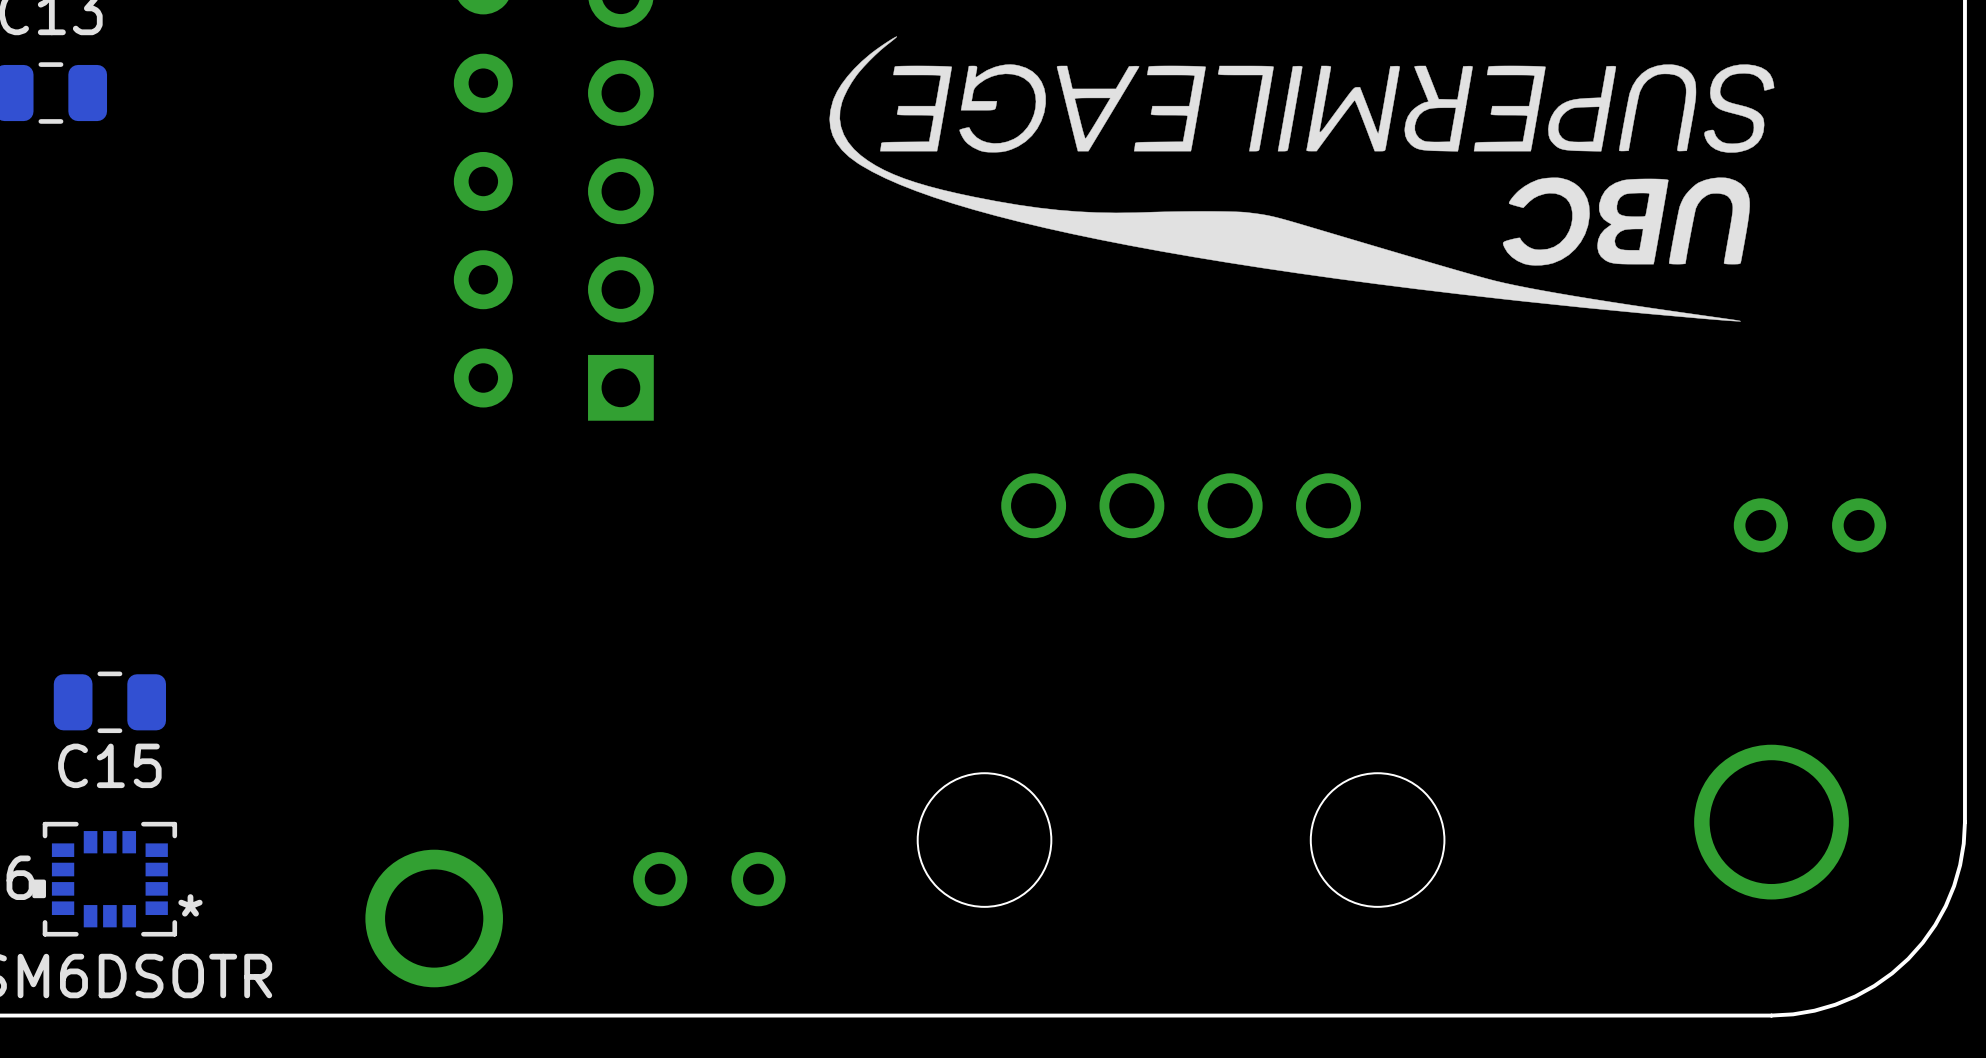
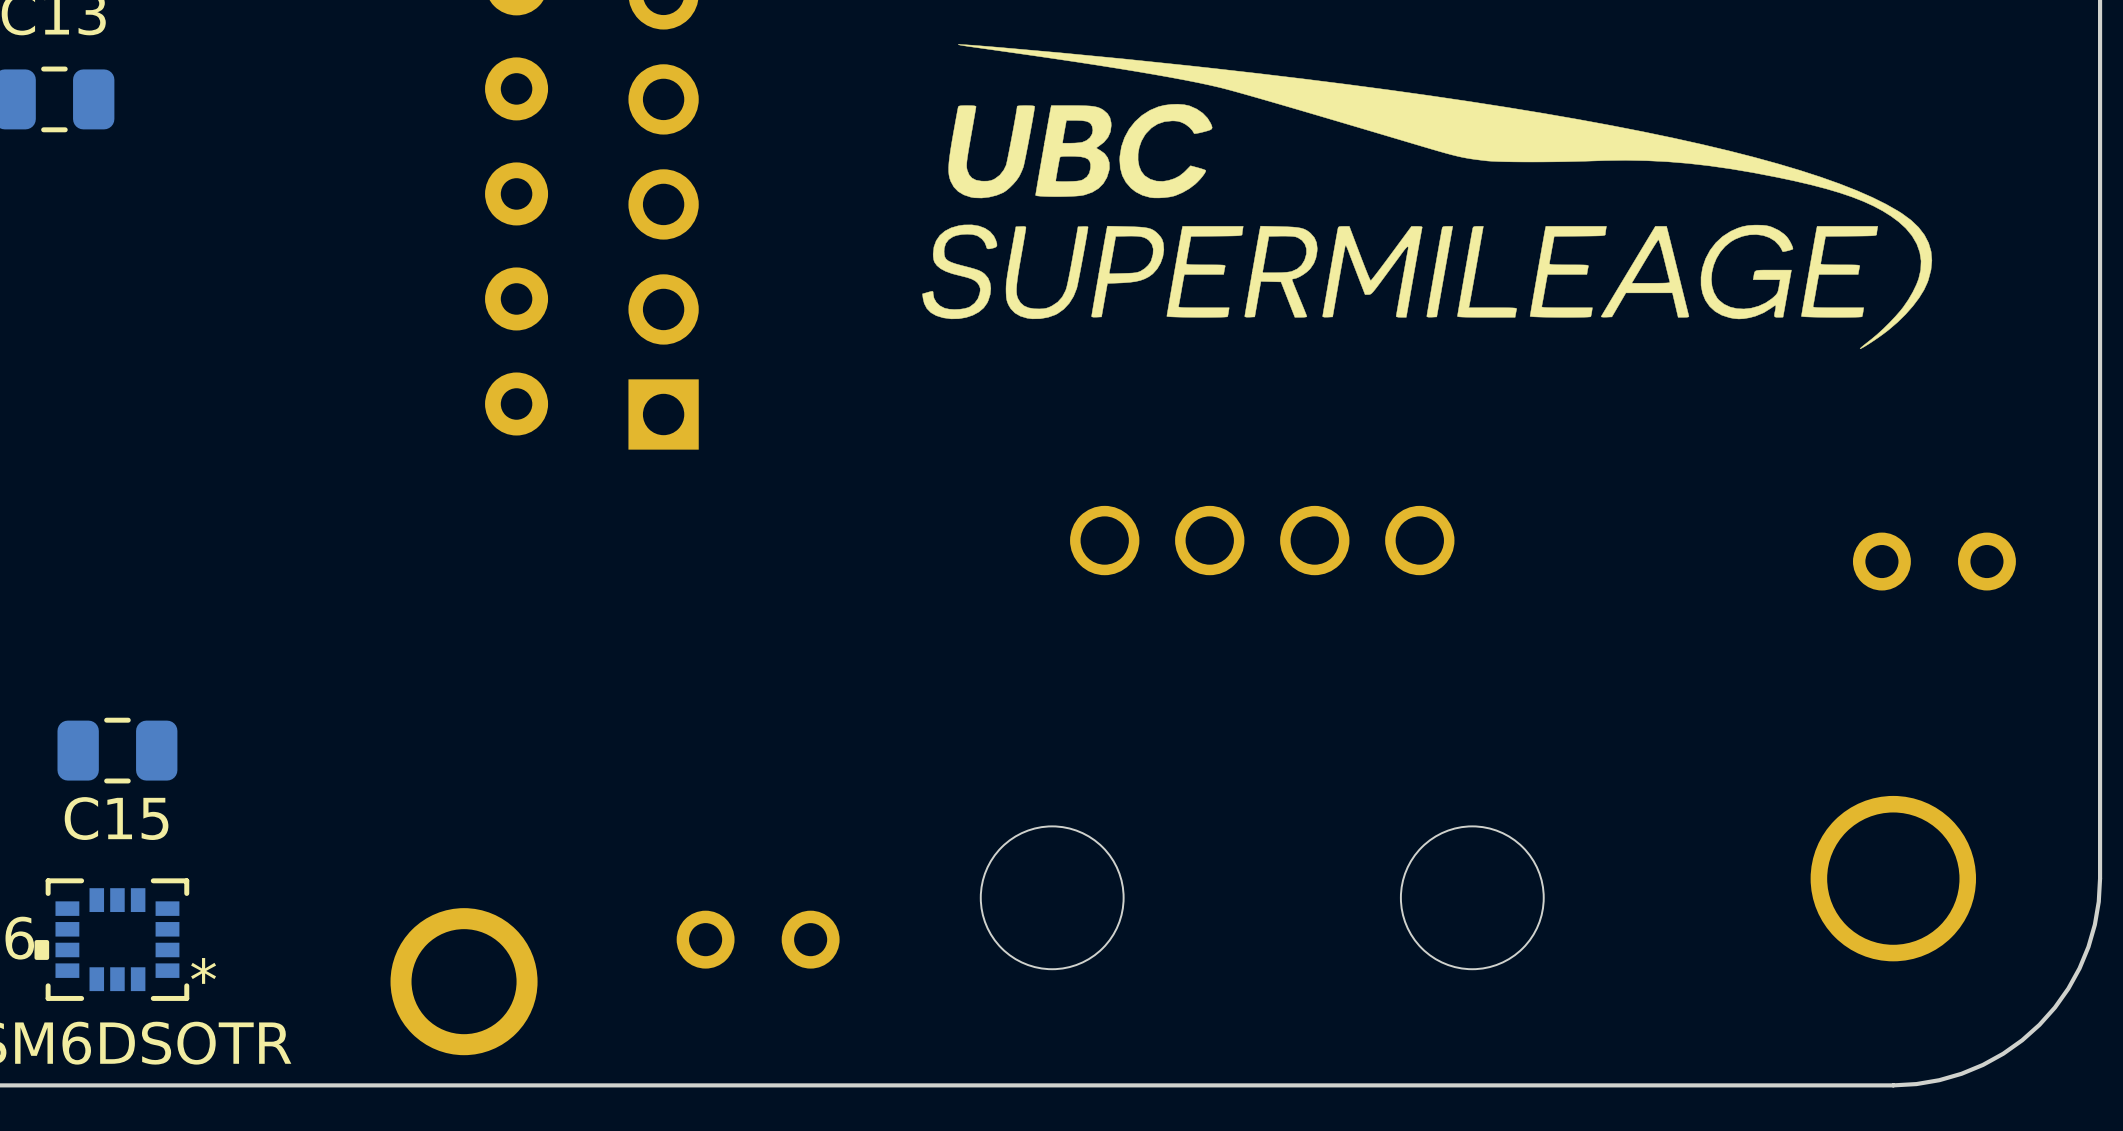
drawing shape: [829, 36, 1775, 322] -> [922, 44, 1933, 349]

